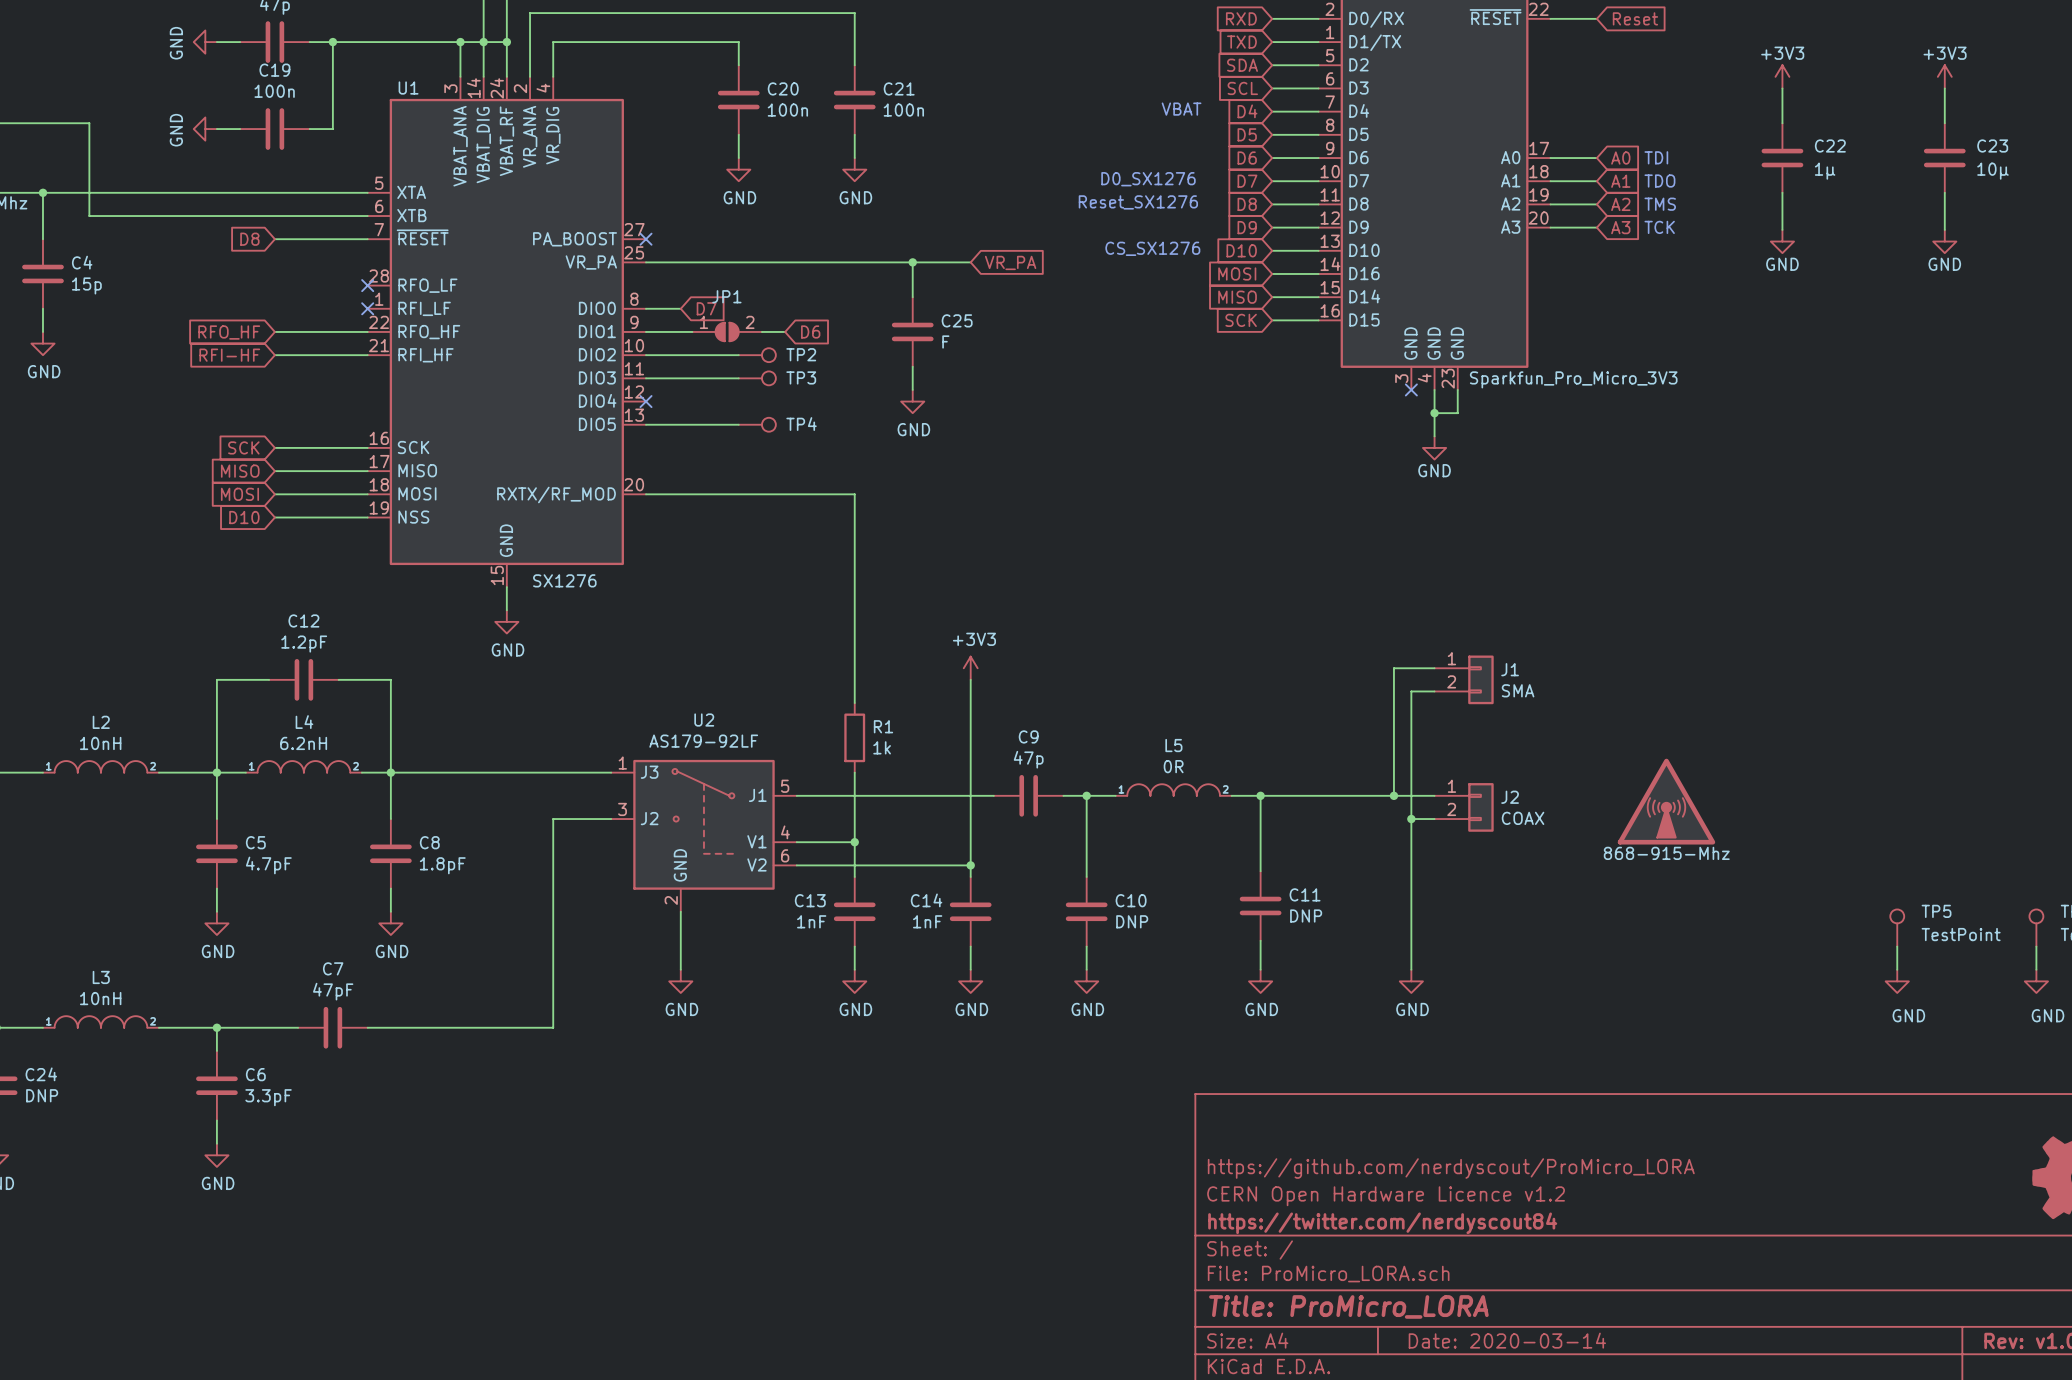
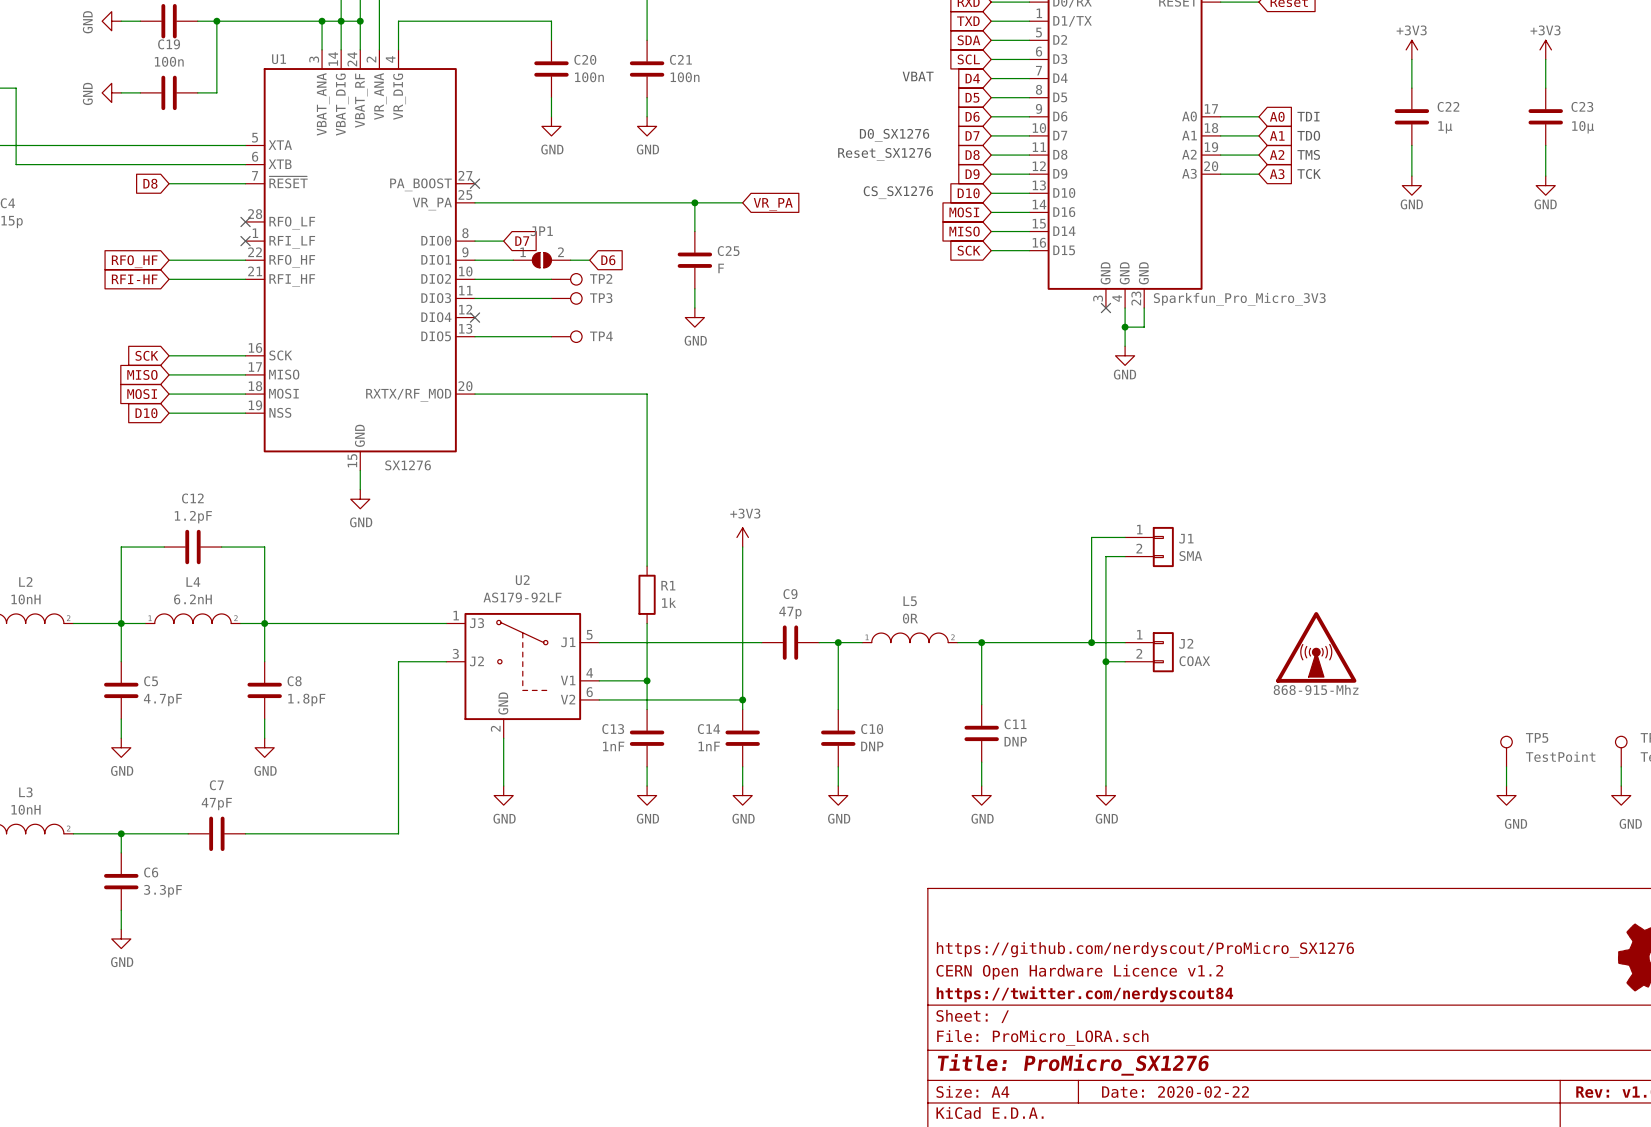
title block: https://github.com/nerdyscout/ProMicro_LORA (1451, 1168) -> https://github.com/nerdyscout/ProMicro_SX1276 (1145, 949)
title block: Title: ProMicro_LORA (1348, 1306) -> Title: ProMicro_SX1276 (1073, 1064)
title block: Date: 2020-03-14 (1507, 1340) -> Date: 2020-02-22 (1175, 1092)

